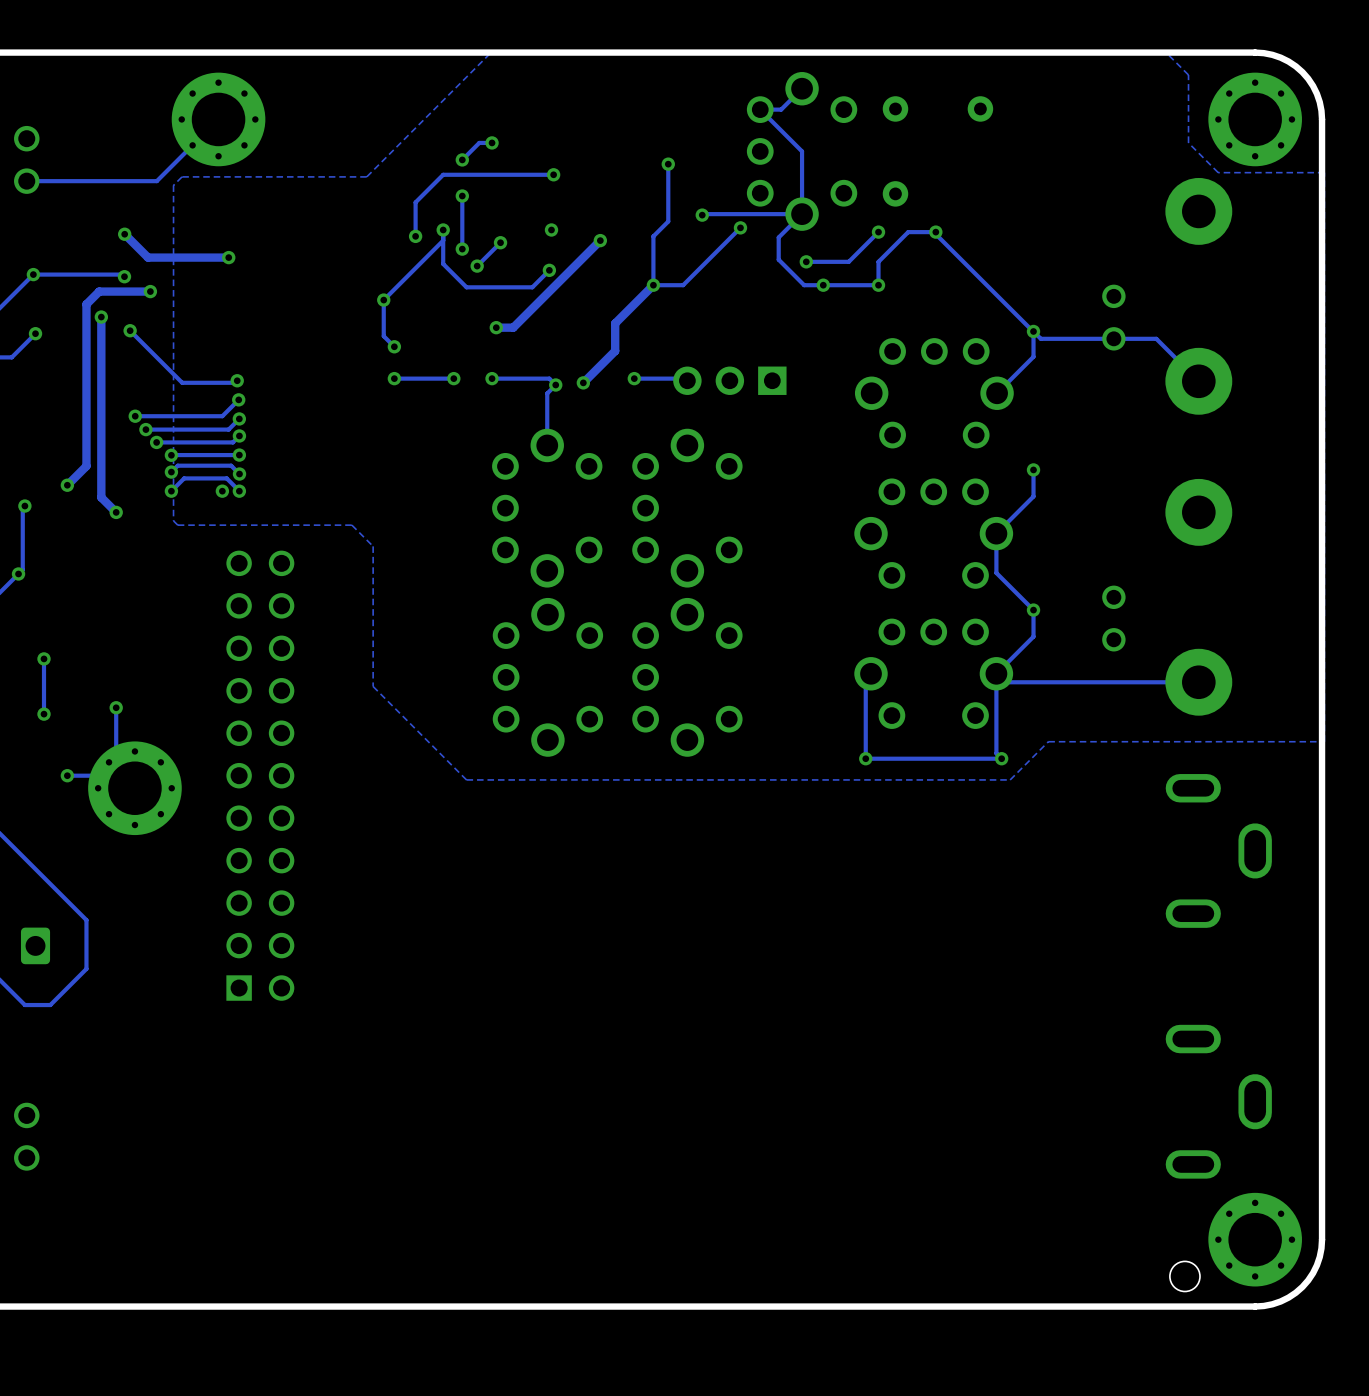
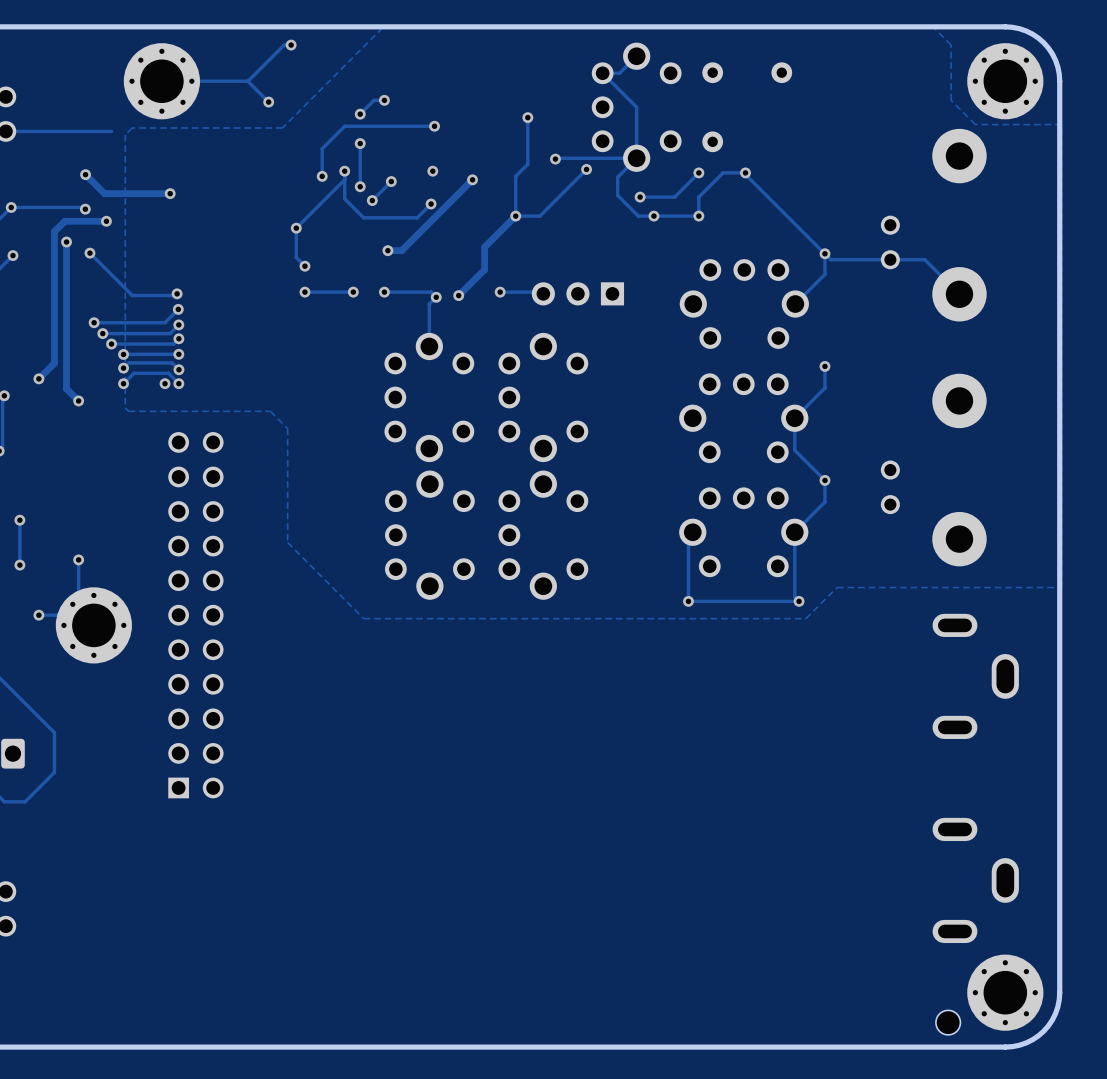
via: none -> (291, 45)
track: (218, 119) (156, 181) -> (161, 81) (248, 81) (284, 45) (291, 45)
track: none -> (247, 81) (268, 102)
via: none -> (268, 102)
track: (1198, 682) (1004, 682) -> none

